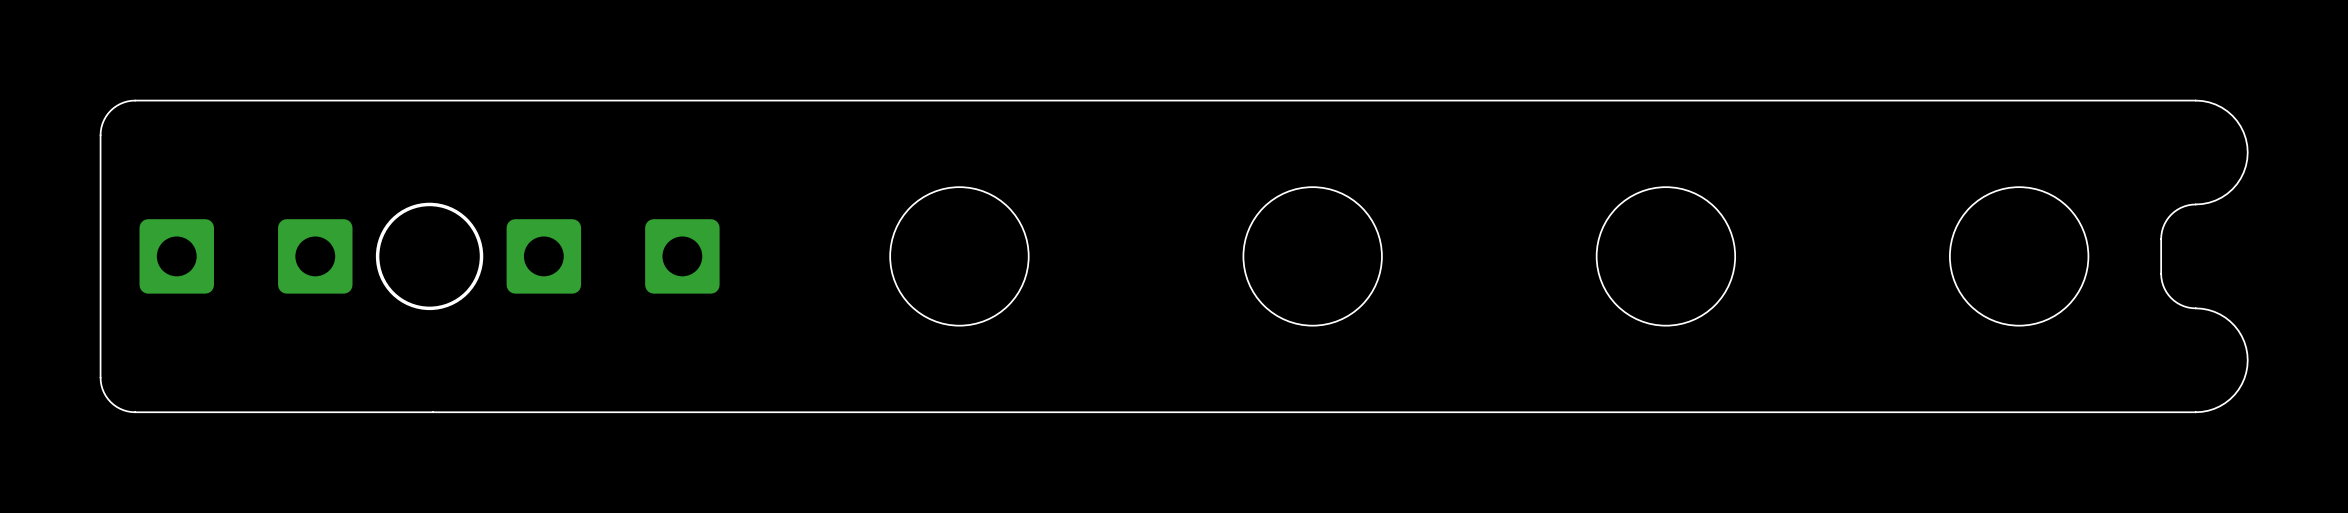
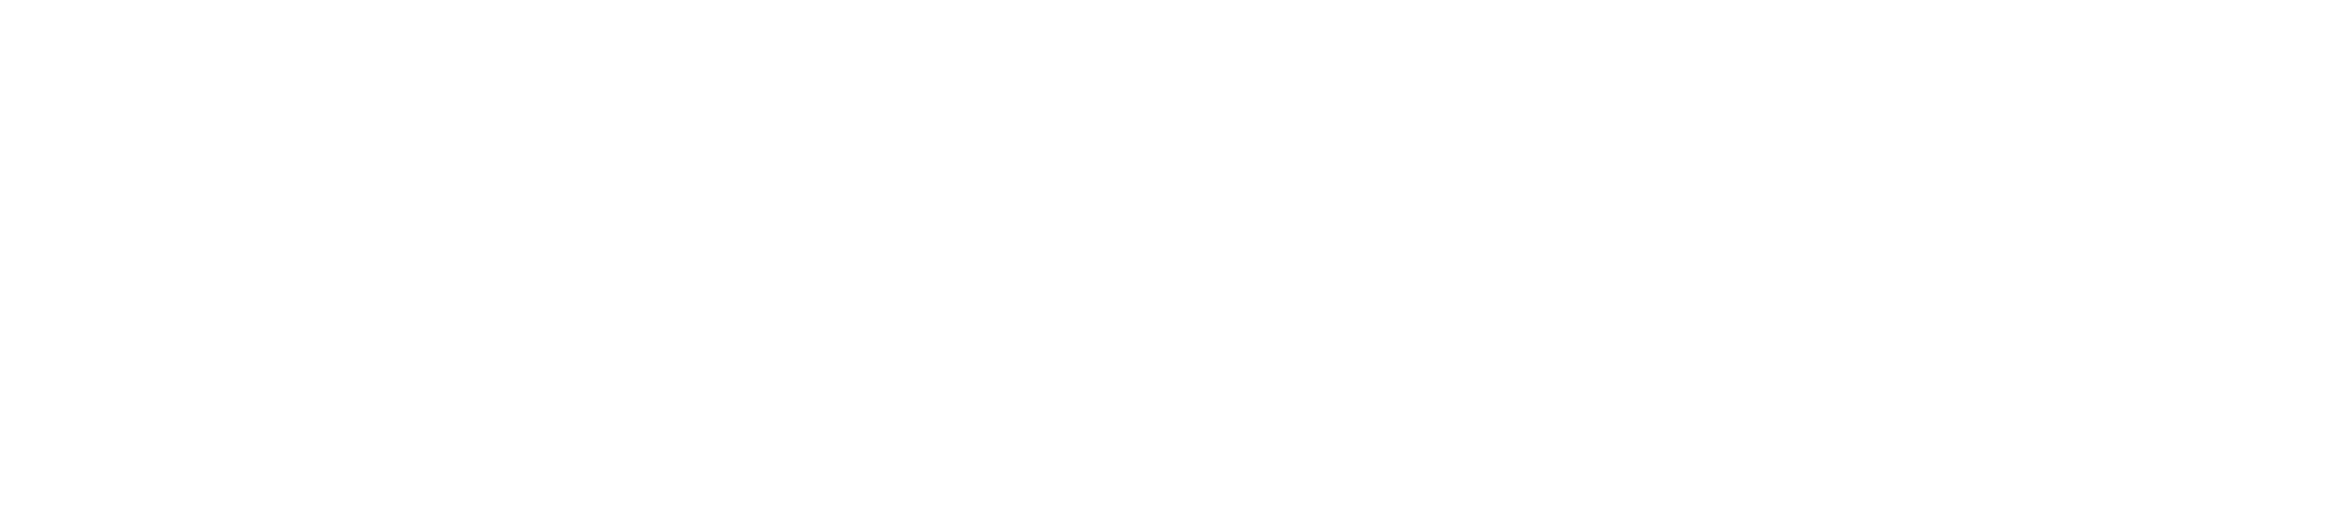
board edge: (2195, 100) (131, 100) (120, 103) (110, 110) (103, 120) (100, 131) (100, 381) (105, 396) (113, 404) (123, 410) (135, 412) (2202, 411) (2214, 408) (2225, 403) (2238, 389) (2244, 378) (2247, 366) (2246, 347) (2238, 330) (2225, 317) (2208, 309) (2184, 306) (2168, 295) (2161, 277) (2162, 231) (2166, 220) (2177, 209) (2188, 205) (2215, 200) (2232, 189) (2243, 172) (2247, 152) (2243, 132) (2232, 115) (2215, 104) (2195, 100) -> none
round board edge: [889, 186, 1030, 327] -> none
round board edge: [1242, 186, 1383, 327] -> none
round board edge: [1595, 186, 1737, 327] -> none
round board edge: [1949, 186, 2090, 327] -> none
round board edge: [375, 202, 484, 311] -> none
part: (176, 256) -> none
part: (315, 256) -> none
part: (543, 256) -> none
part: (682, 256) -> none

